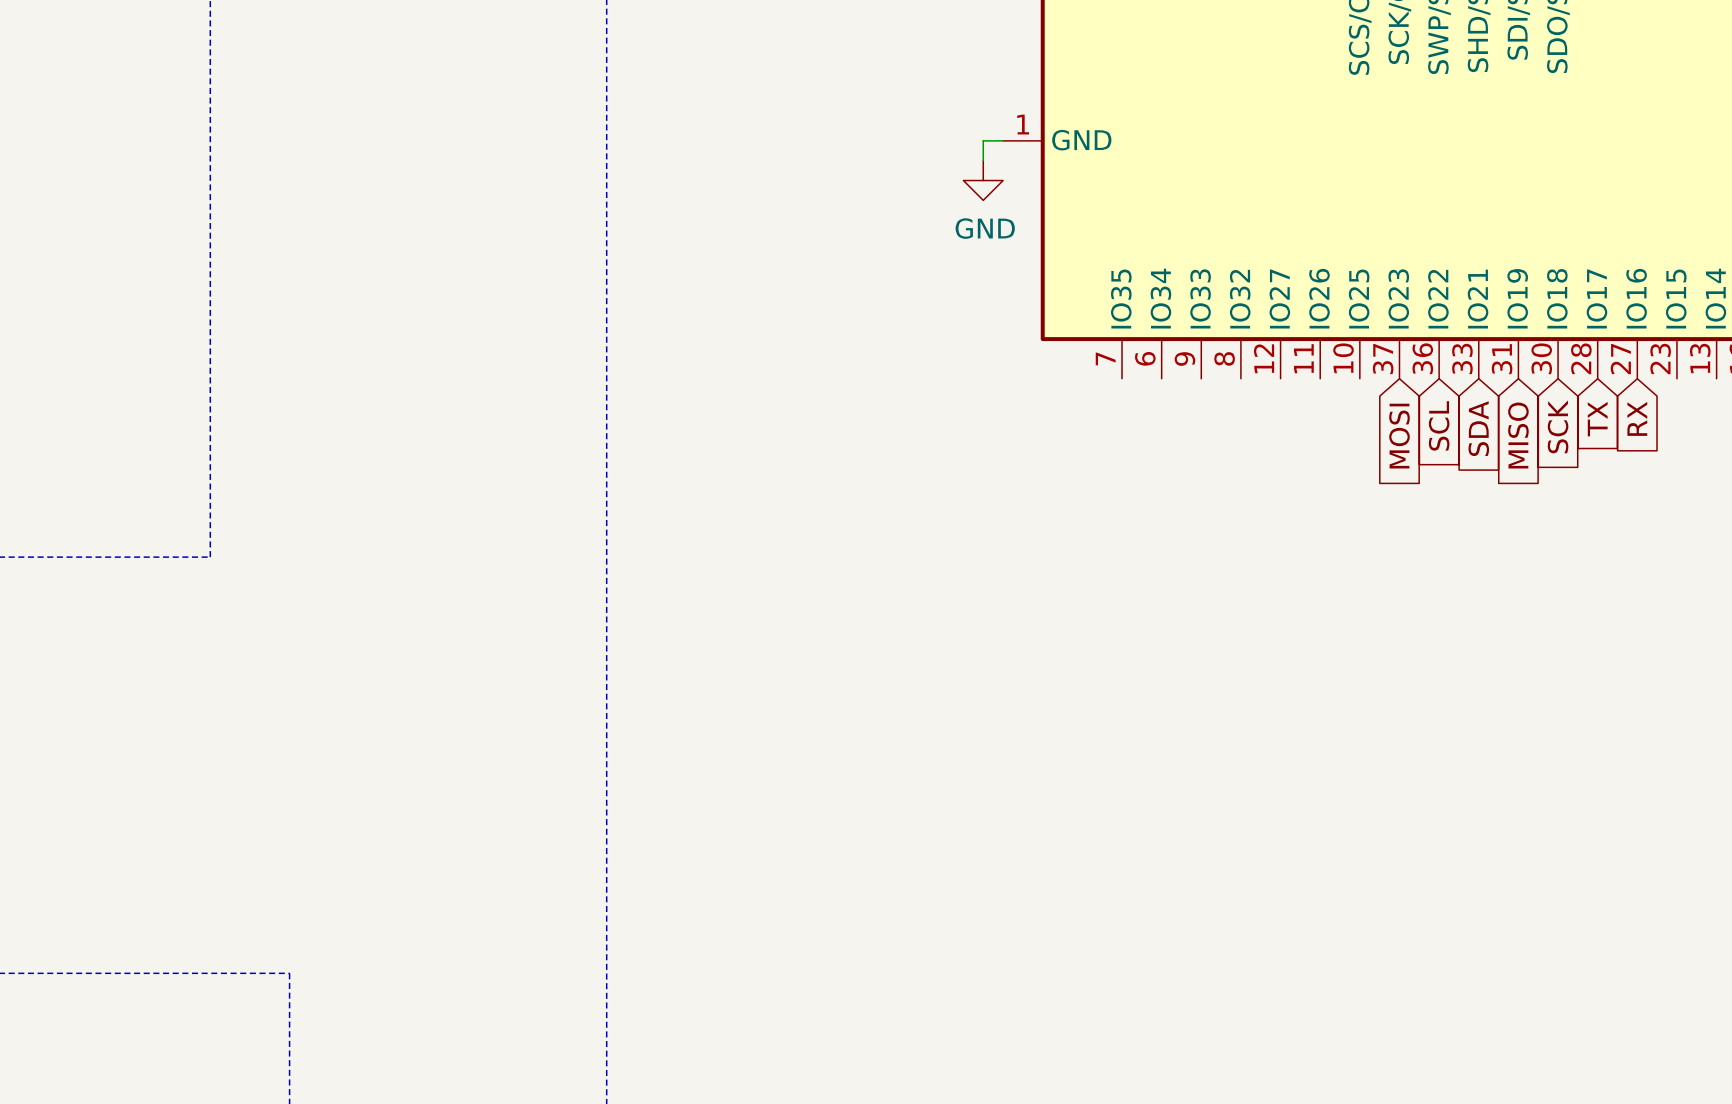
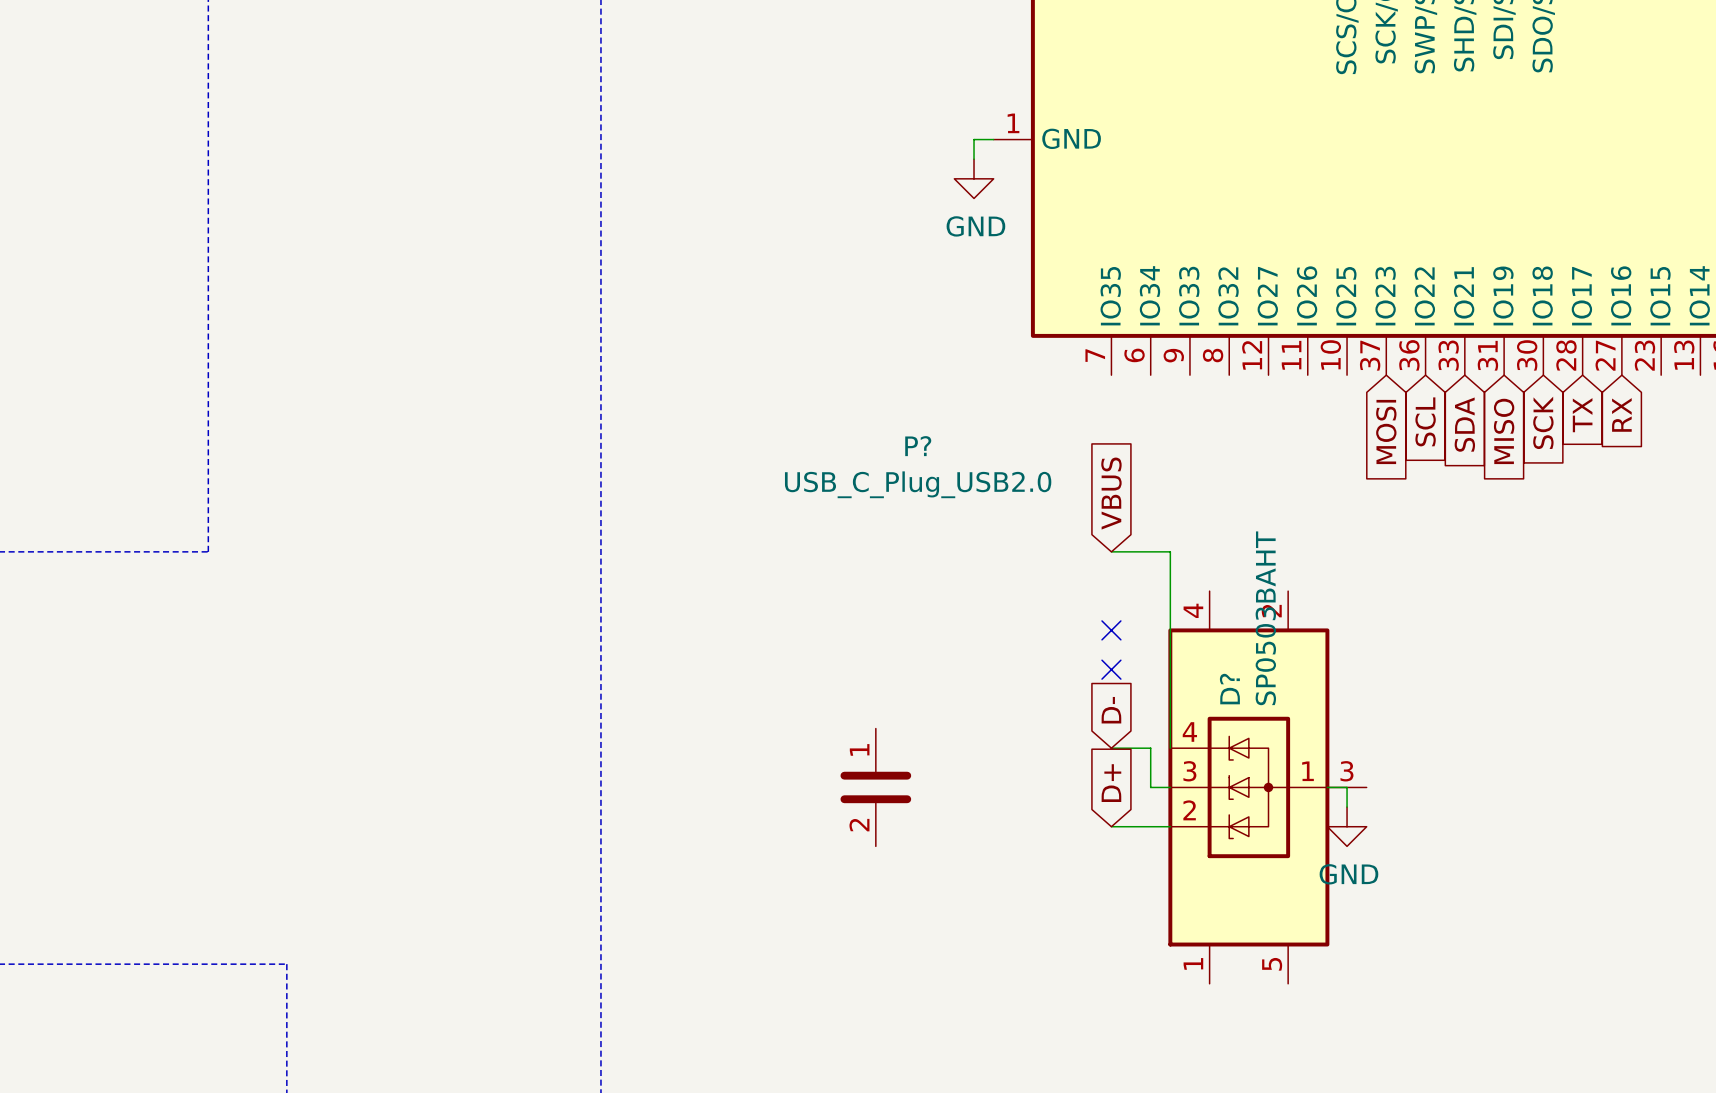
global label: none -> VBUS (1111, 493)
wire: none -> (1111, 551) (1170, 551) (1170, 748)
no-connect mark: none -> (1111, 630)
no-connect mark: none -> (1111, 669)
global label: none -> D- (1111, 710)
wire: none -> (1111, 748) (1150, 748) (1150, 787) (1170, 787)
global label: none -> D+ (1111, 783)
P?: none -> USB_C_Plug_USB2.0 (875, 787)
D?: none -> SP0503BAHT (1267, 787)
wire: none -> (1327, 787) (1347, 787) (1347, 807)
wire: none -> (1111, 826) (1170, 826)
power symbol: none -> GND (1347, 826)

